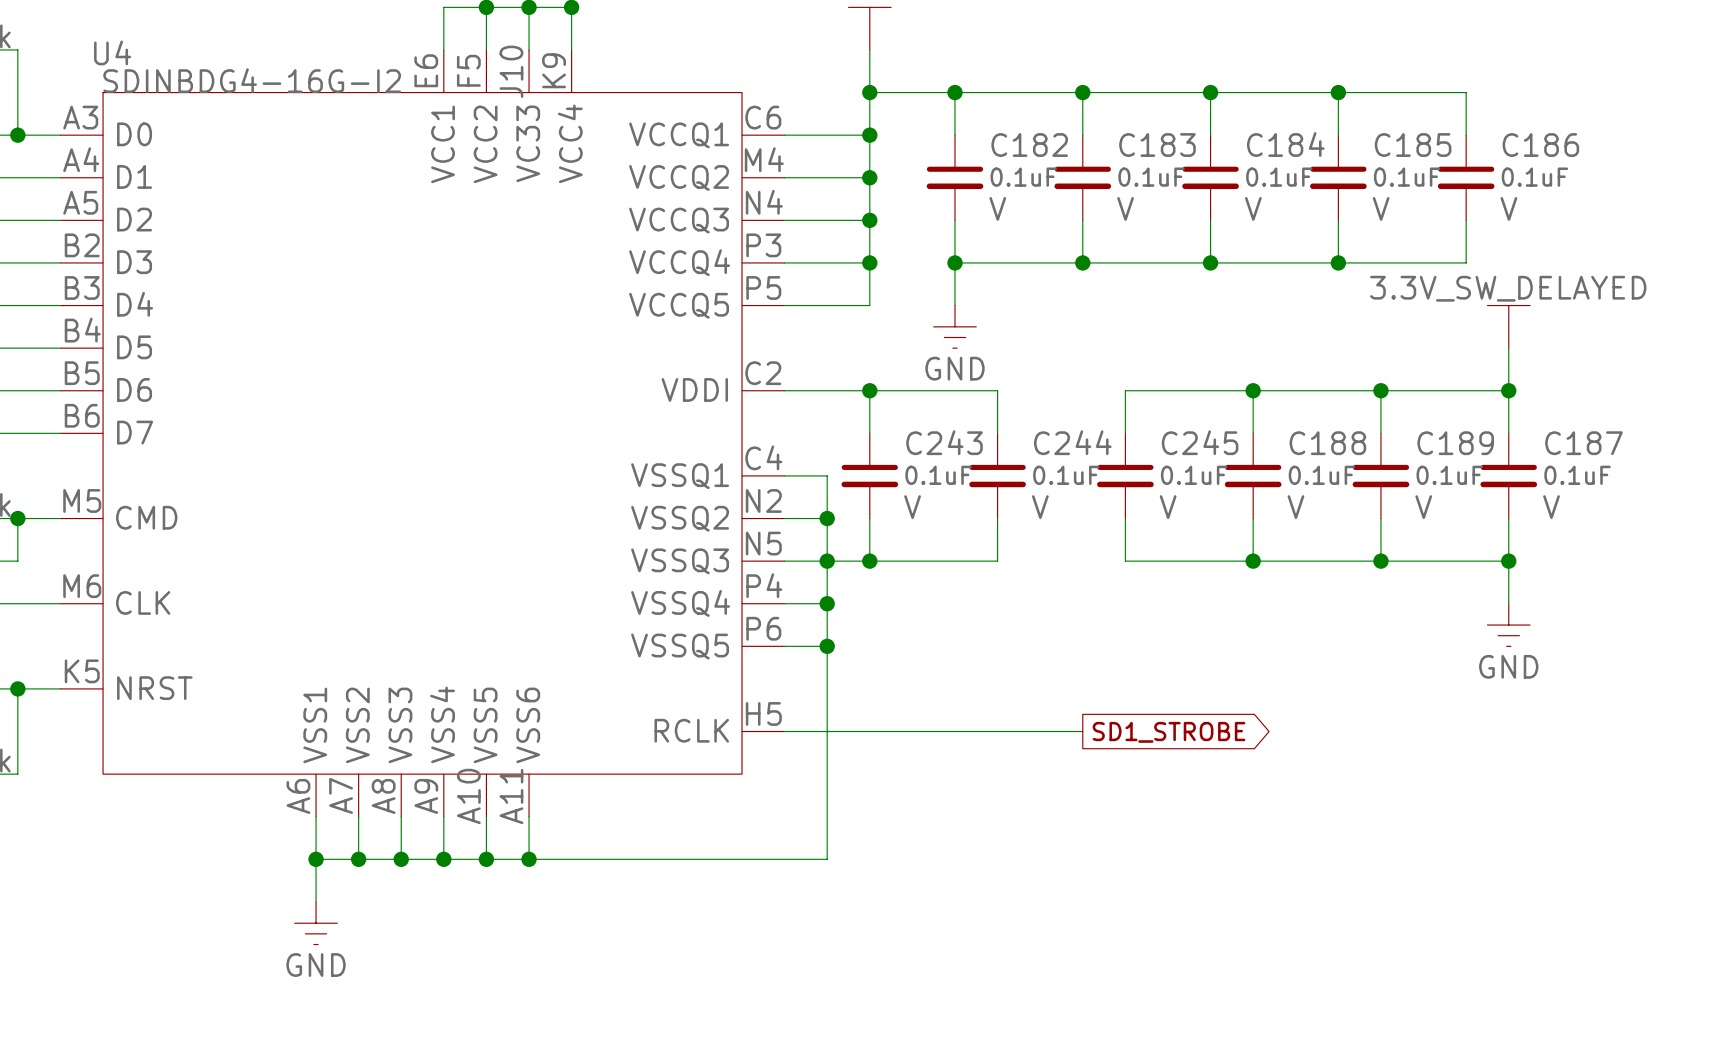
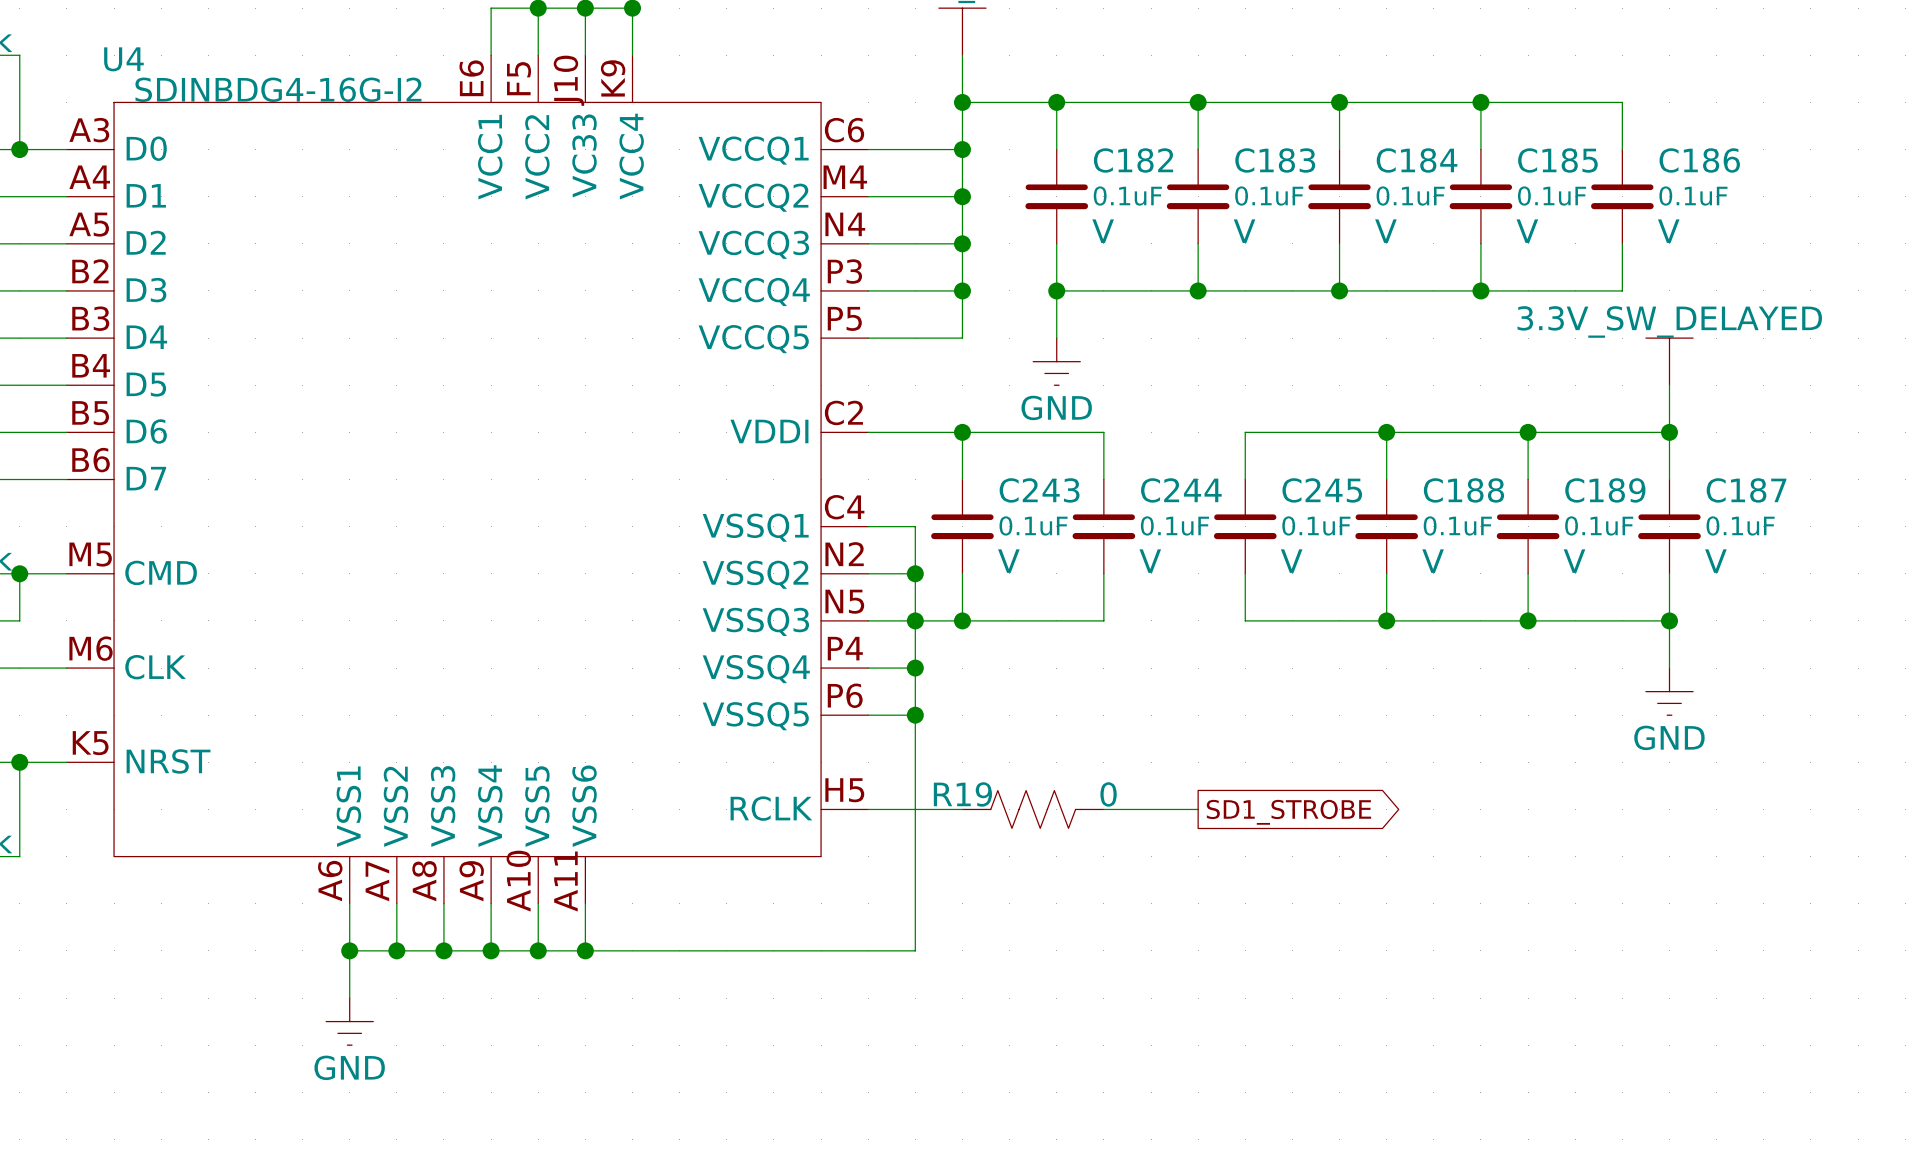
wire: (869, 731) (997, 731) -> none
R19: none -> 0 (1033, 809)

